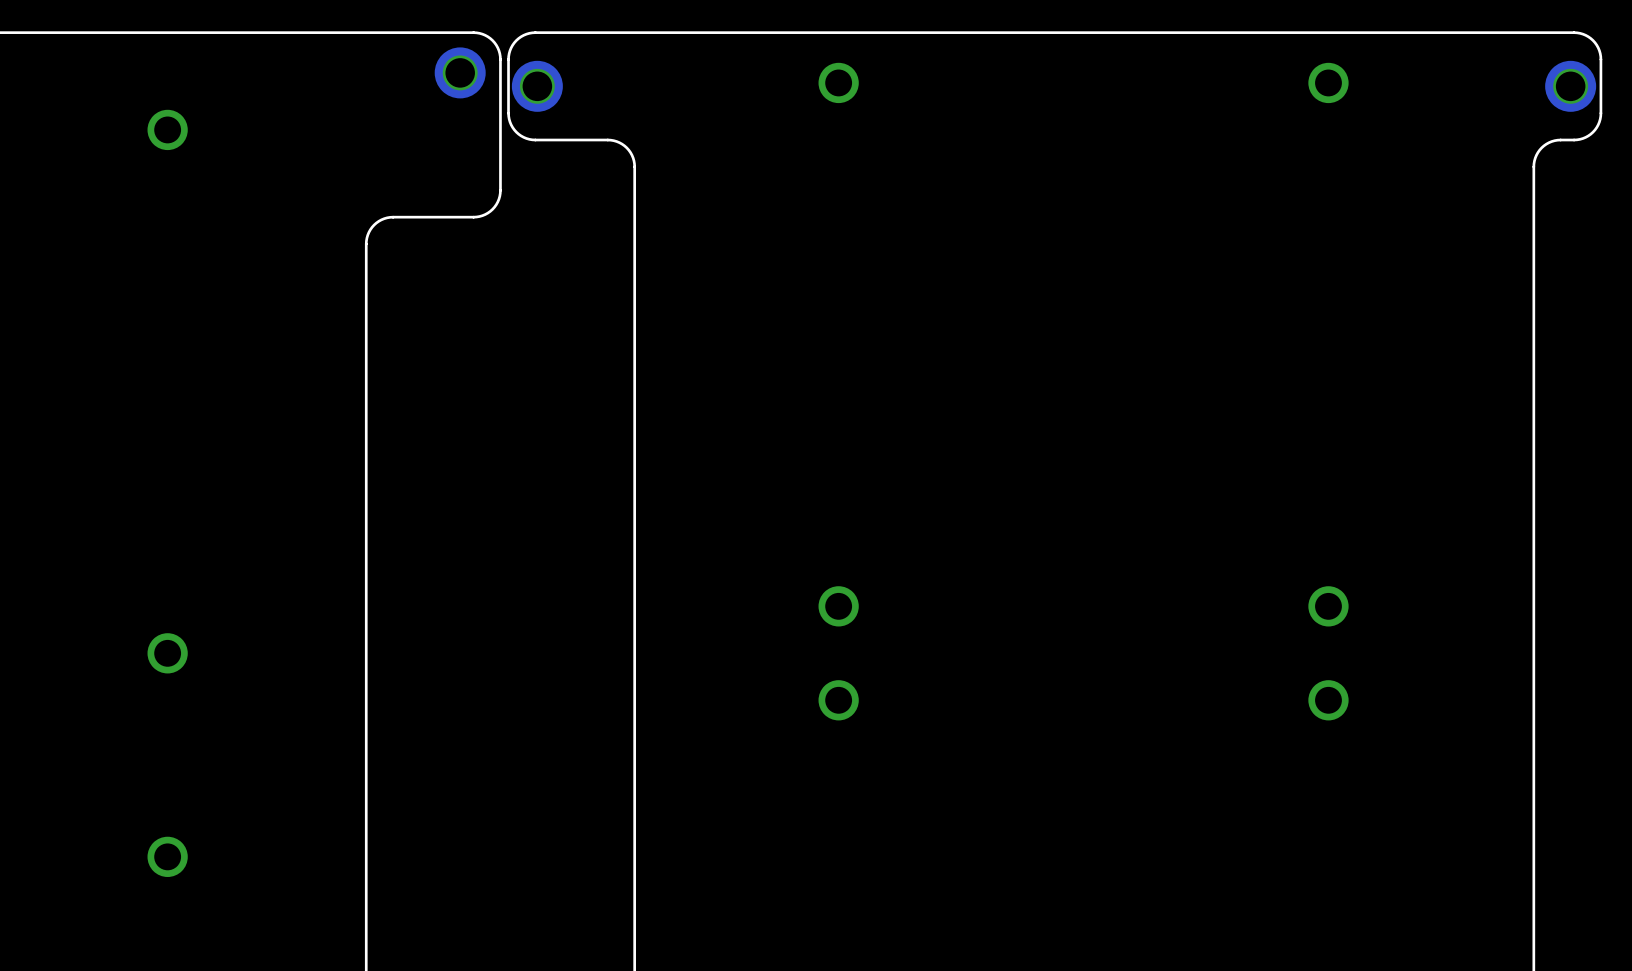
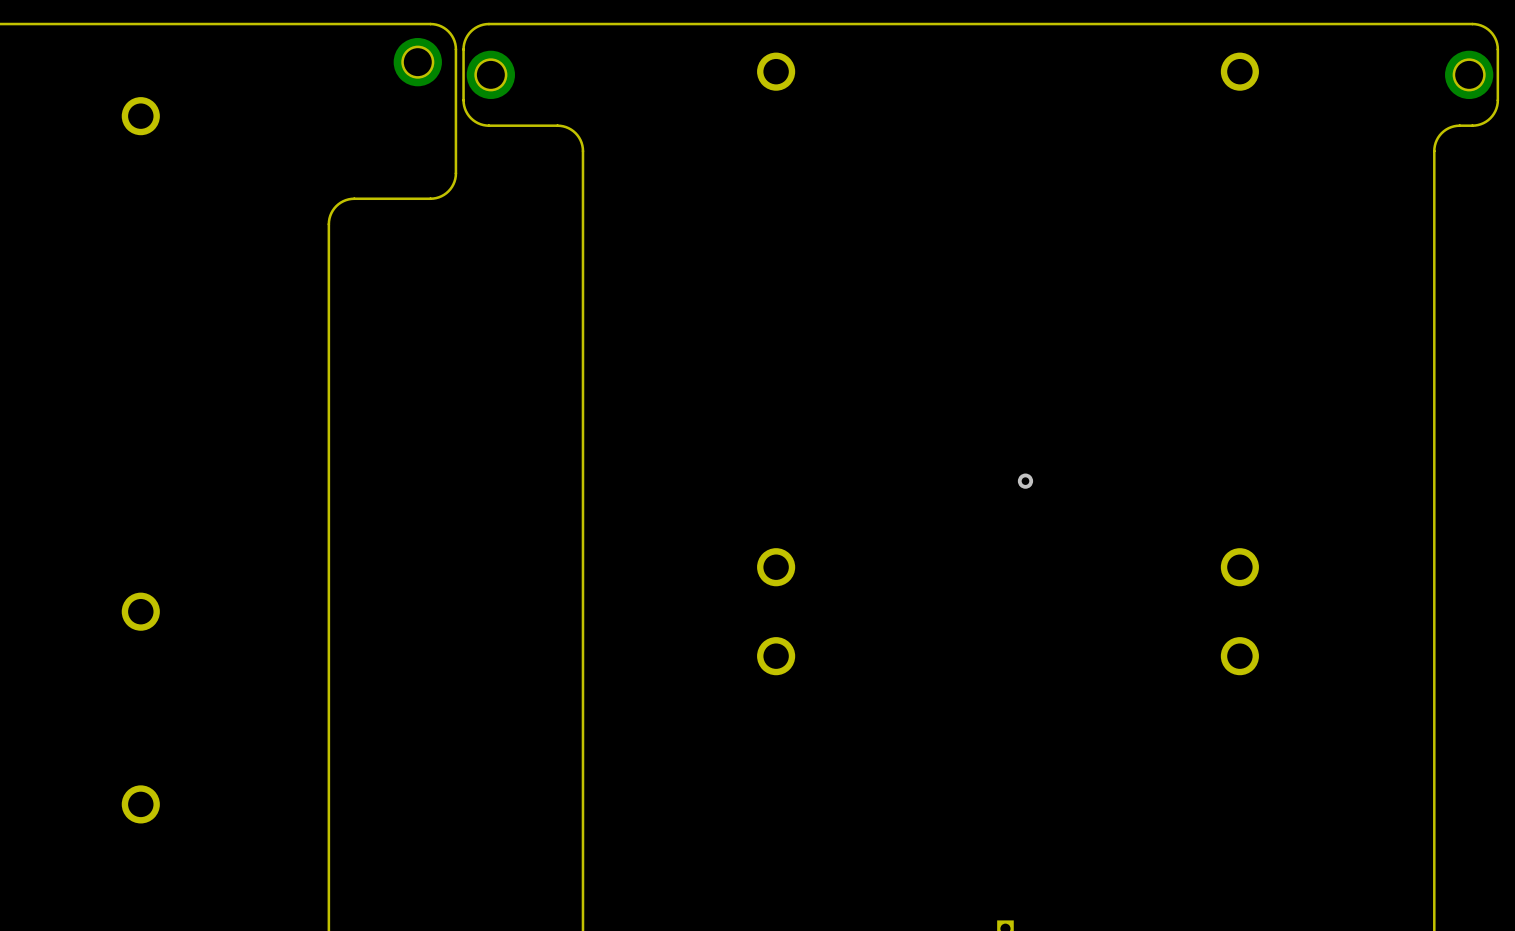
via: none -> (1025, 481)

